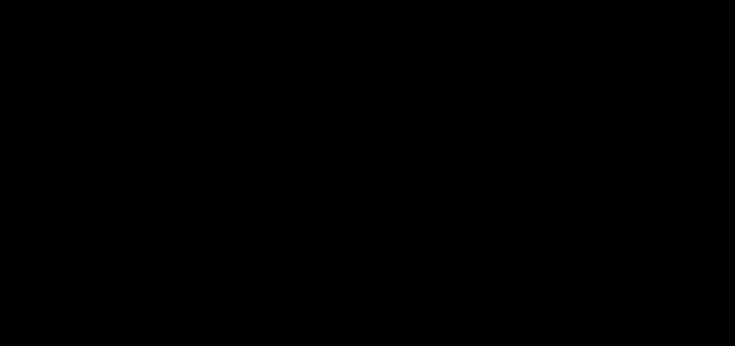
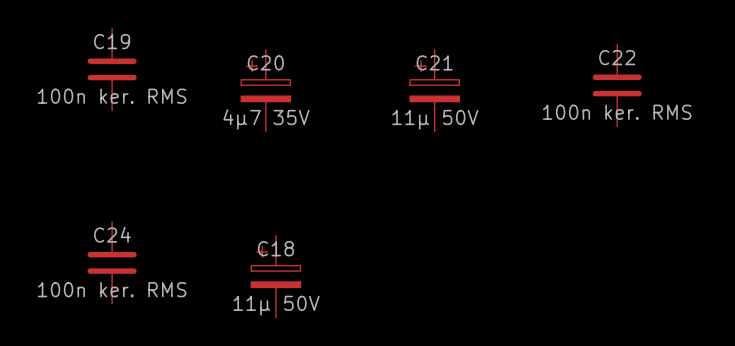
C19: none -> 100n ker. RMS (112, 69)
C22: none -> 100n ker. RMS (617, 85)
C20: none -> 4µ7 35V (265, 90)
C21: none -> 11µ 50V (434, 90)
C24: none -> 100n ker. RMS (112, 262)
C18: none -> 11µ 50V (275, 276)

